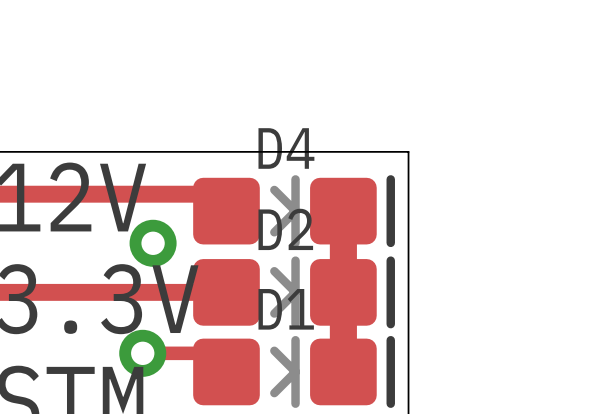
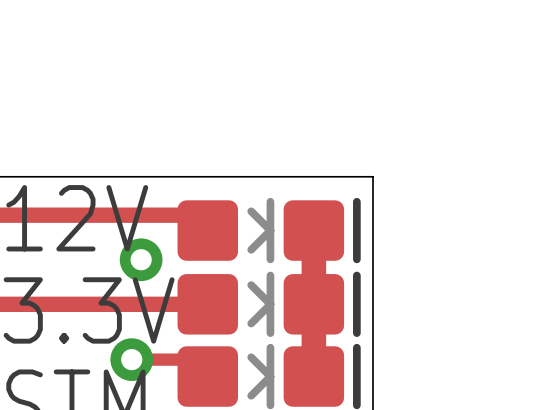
D4 name: D4 (286, 148) -> none
D2 name: D2 (285, 229) -> none
D1 name: D1 (286, 309) -> none

